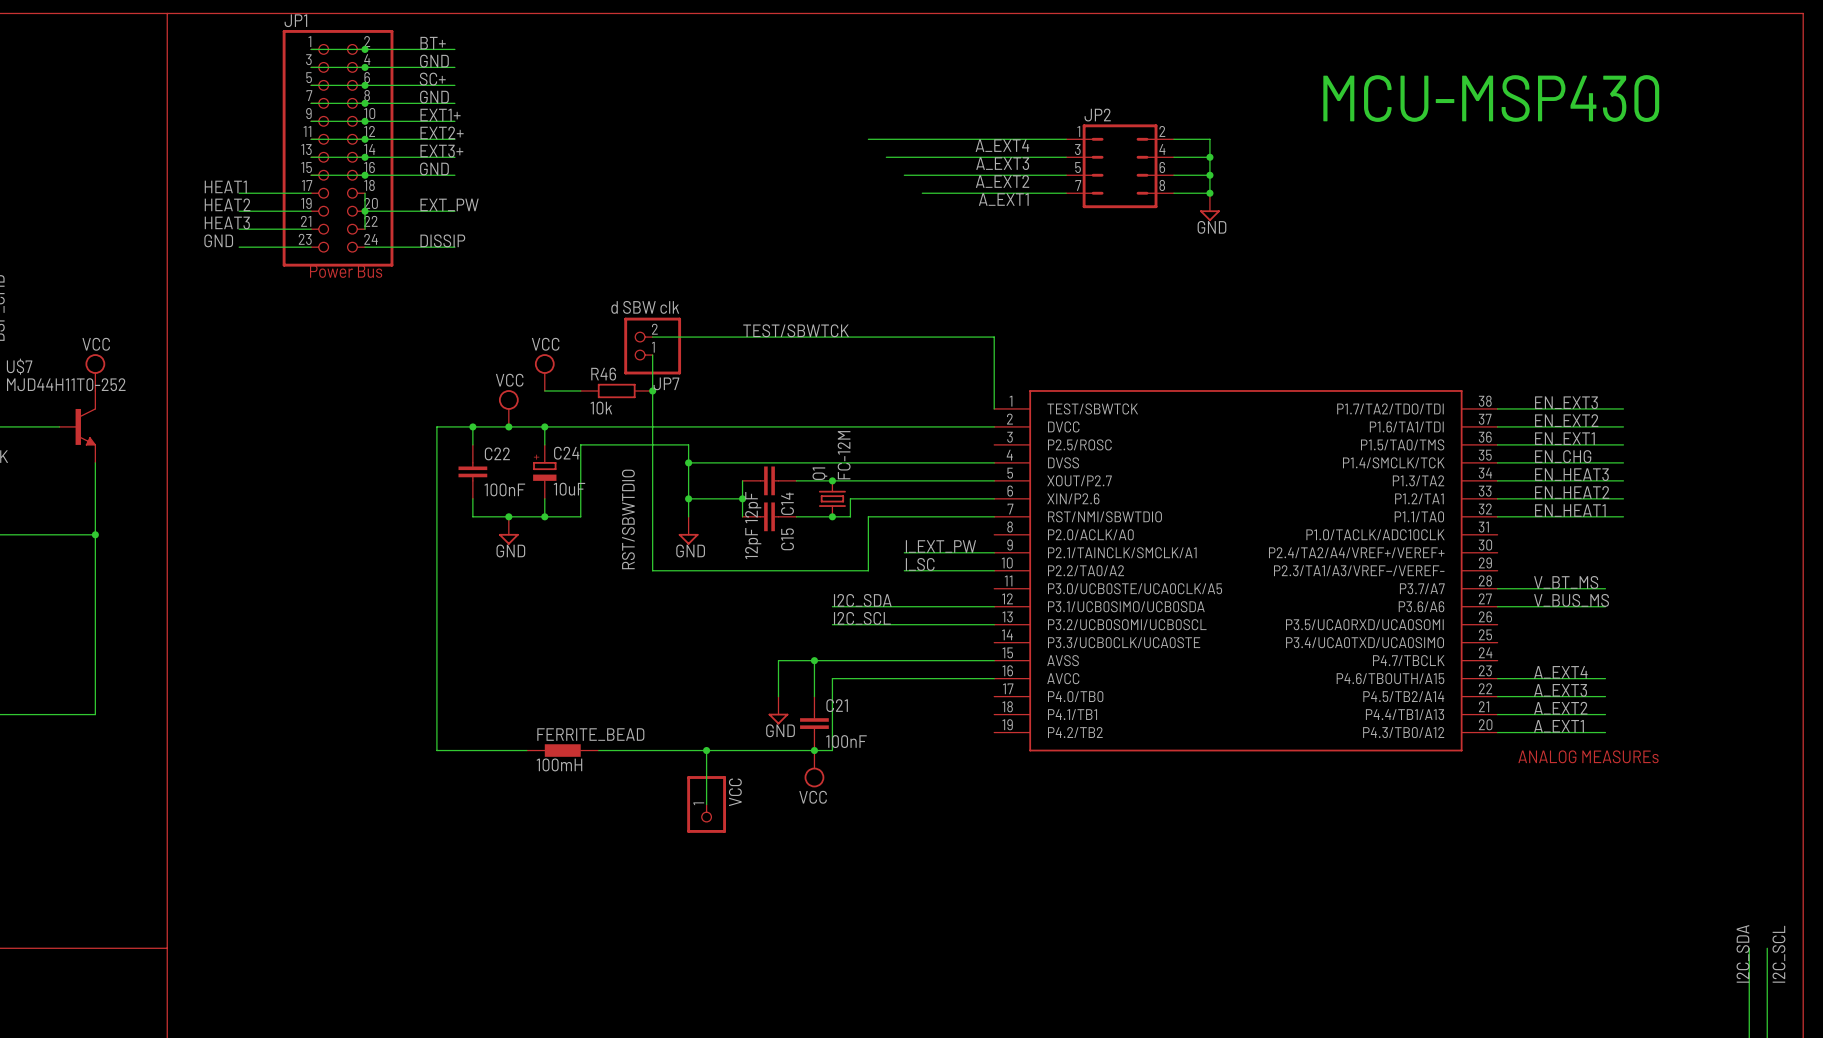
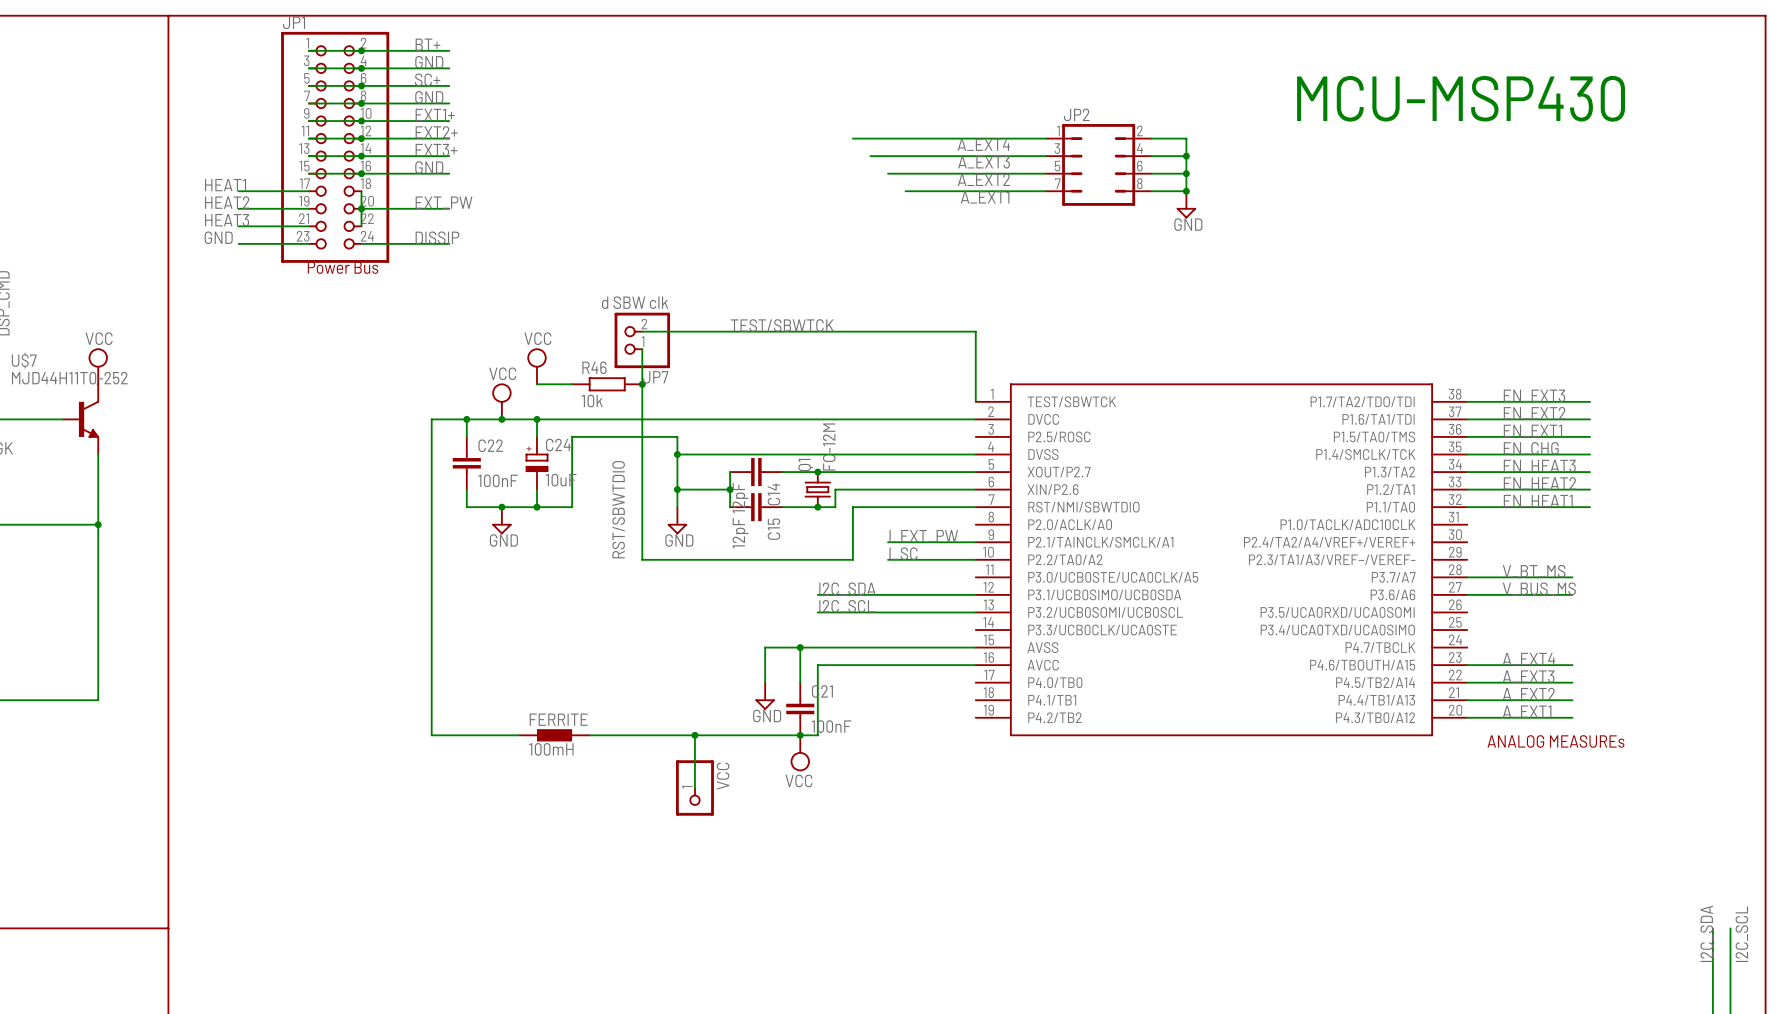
FERRITE_BEAD name: FERRITE_BEAD (590, 734) -> FERRITE (558, 719)

